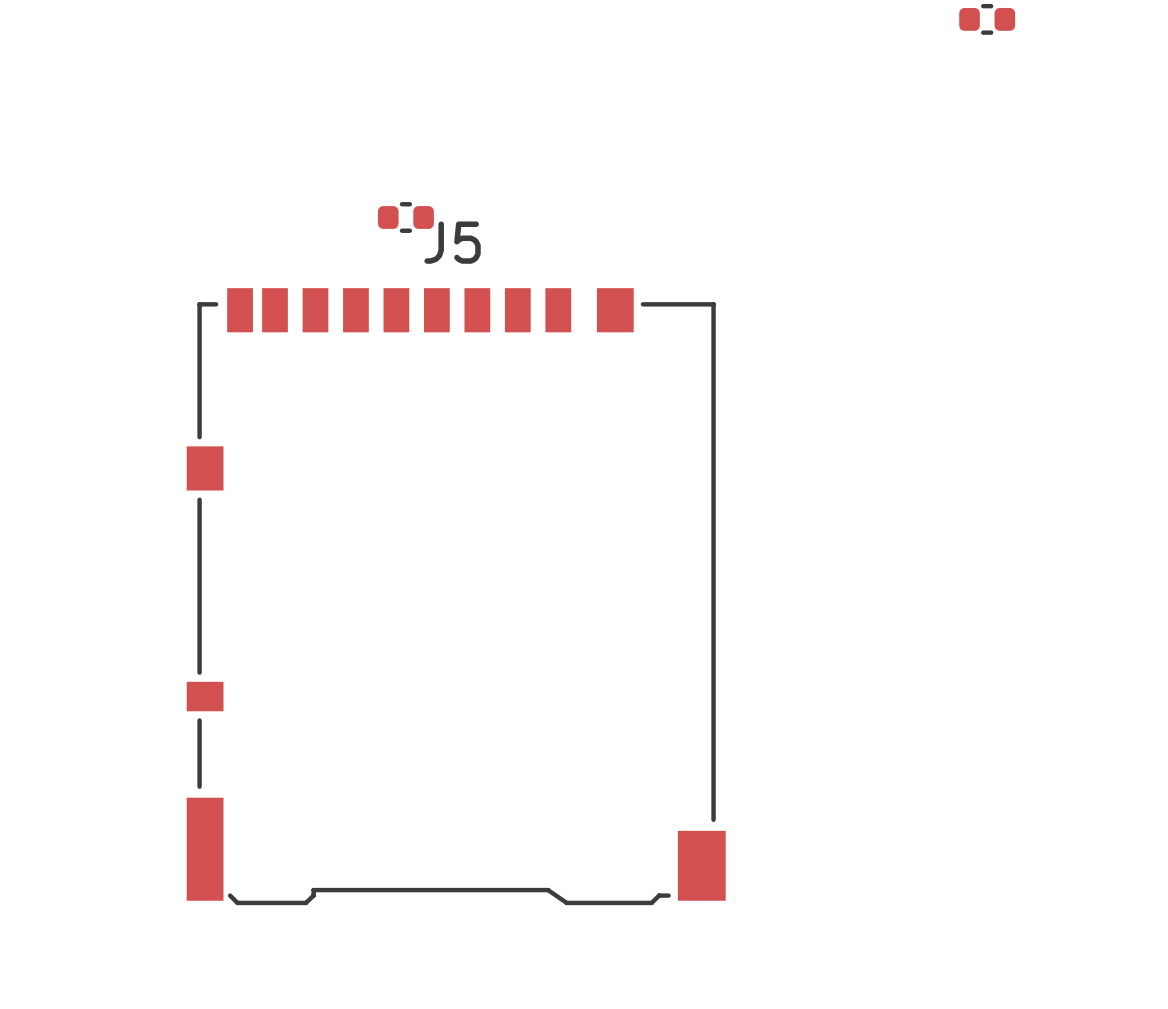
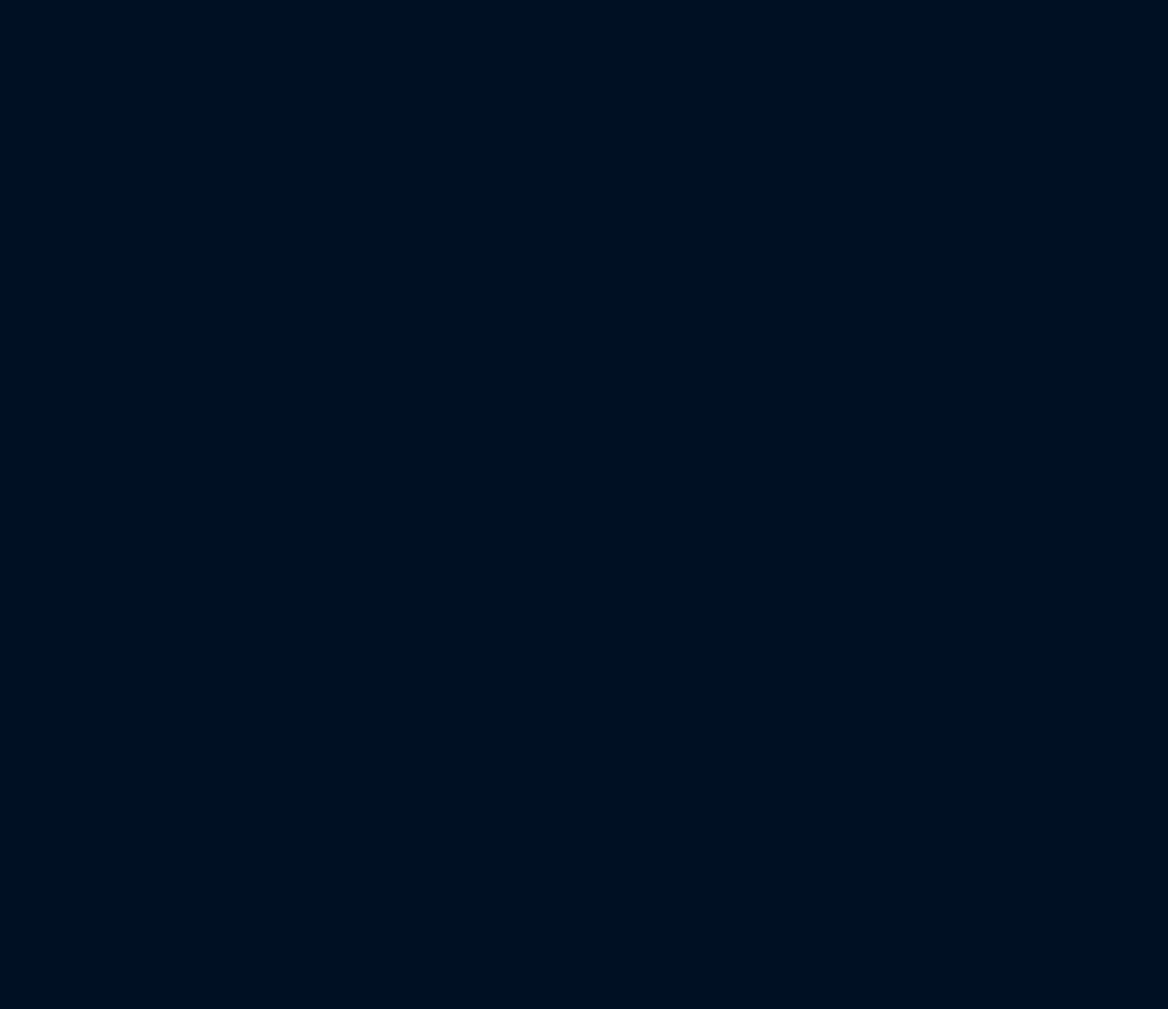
part: (987, 19) -> none
part: (405, 217) -> none
J5: (456, 596) -> none

